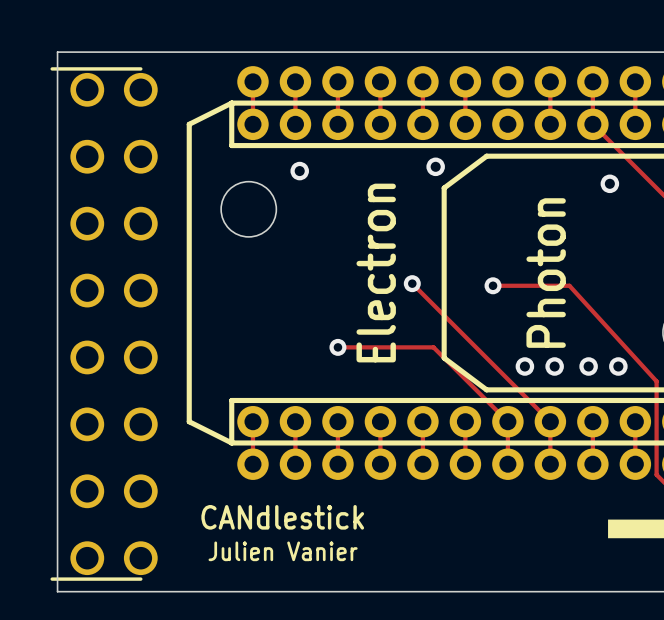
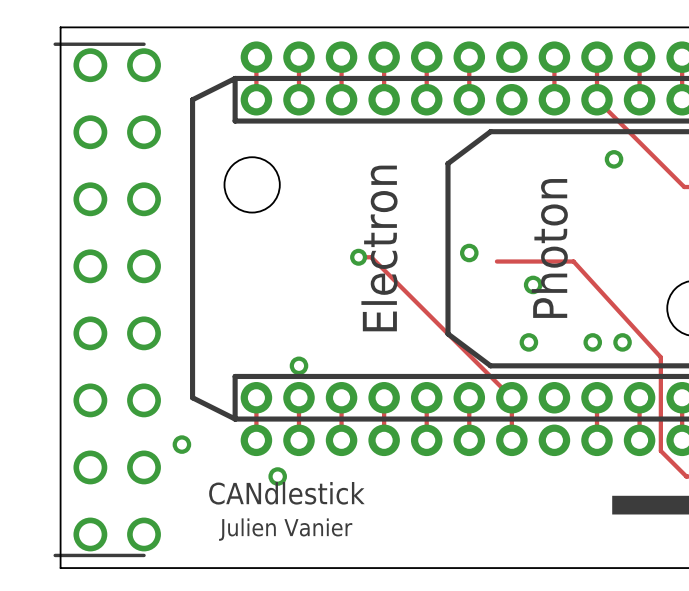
via: (435, 166) -> none
via: (299, 171) -> none
via: none -> (469, 253)
via: none -> (358, 257)
track: (412, 283) (550, 421) (550, 464) -> none
via: (412, 283) -> none
via: (493, 285) -> none
track: (337, 347) (433, 347) -> (358, 257) (371, 257) (437, 323)
via: (337, 347) -> none
via position: (554, 366) -> (533, 284)
via: none -> (298, 365)
via: none -> (181, 444)
via: none -> (277, 476)

